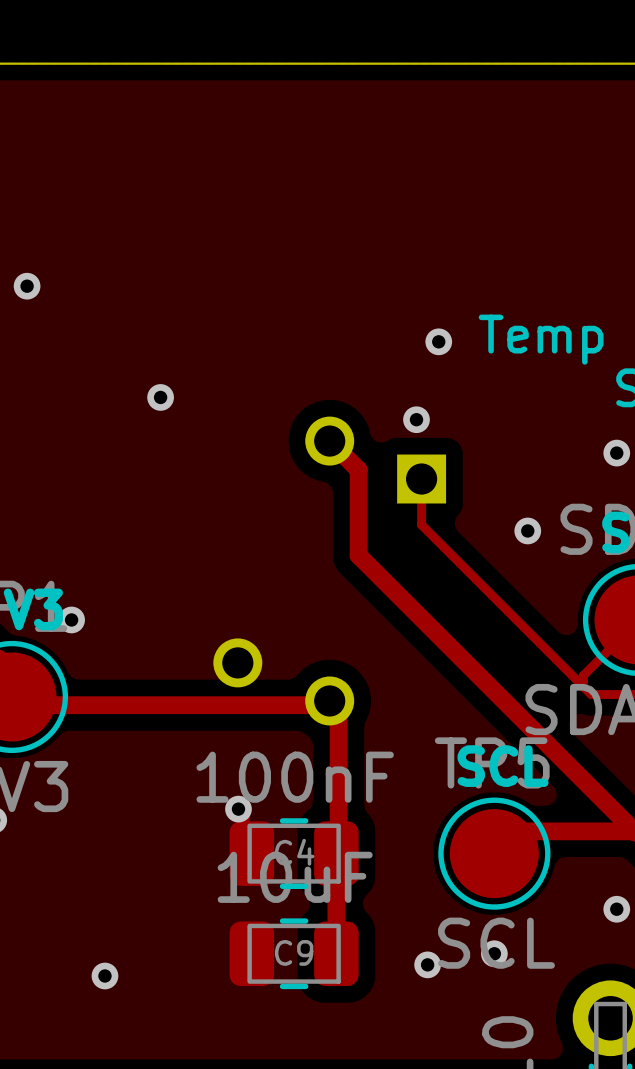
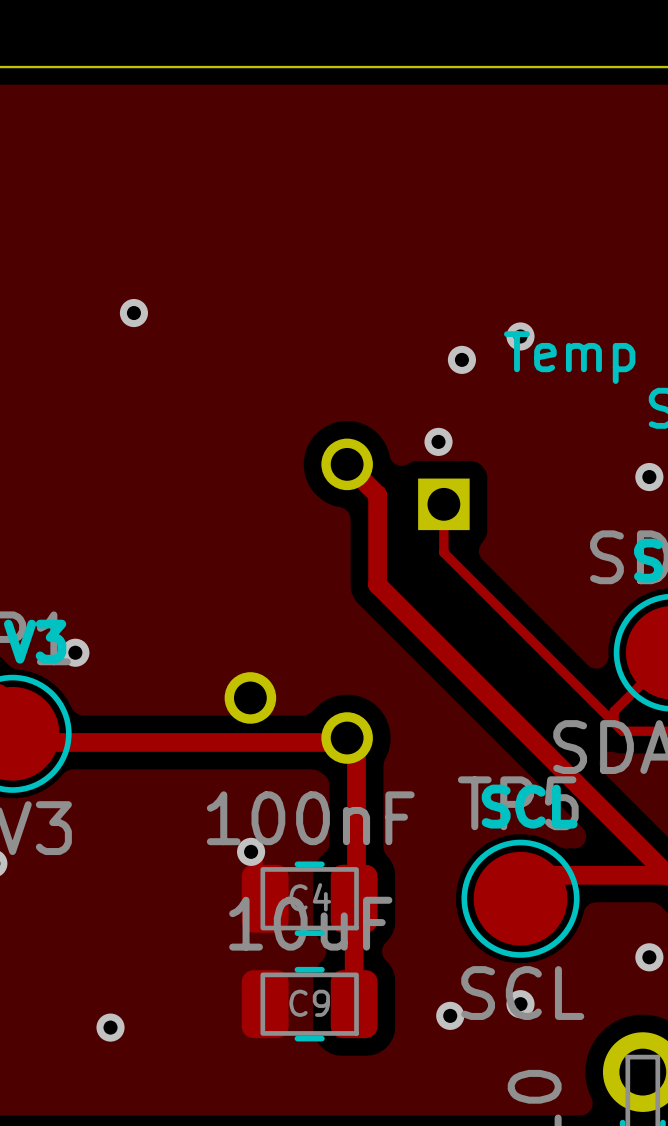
via: (27, 286) -> none
via: none -> (133, 313)
via: none -> (520, 336)
via: (160, 397) -> none
via: (527, 530) -> none

